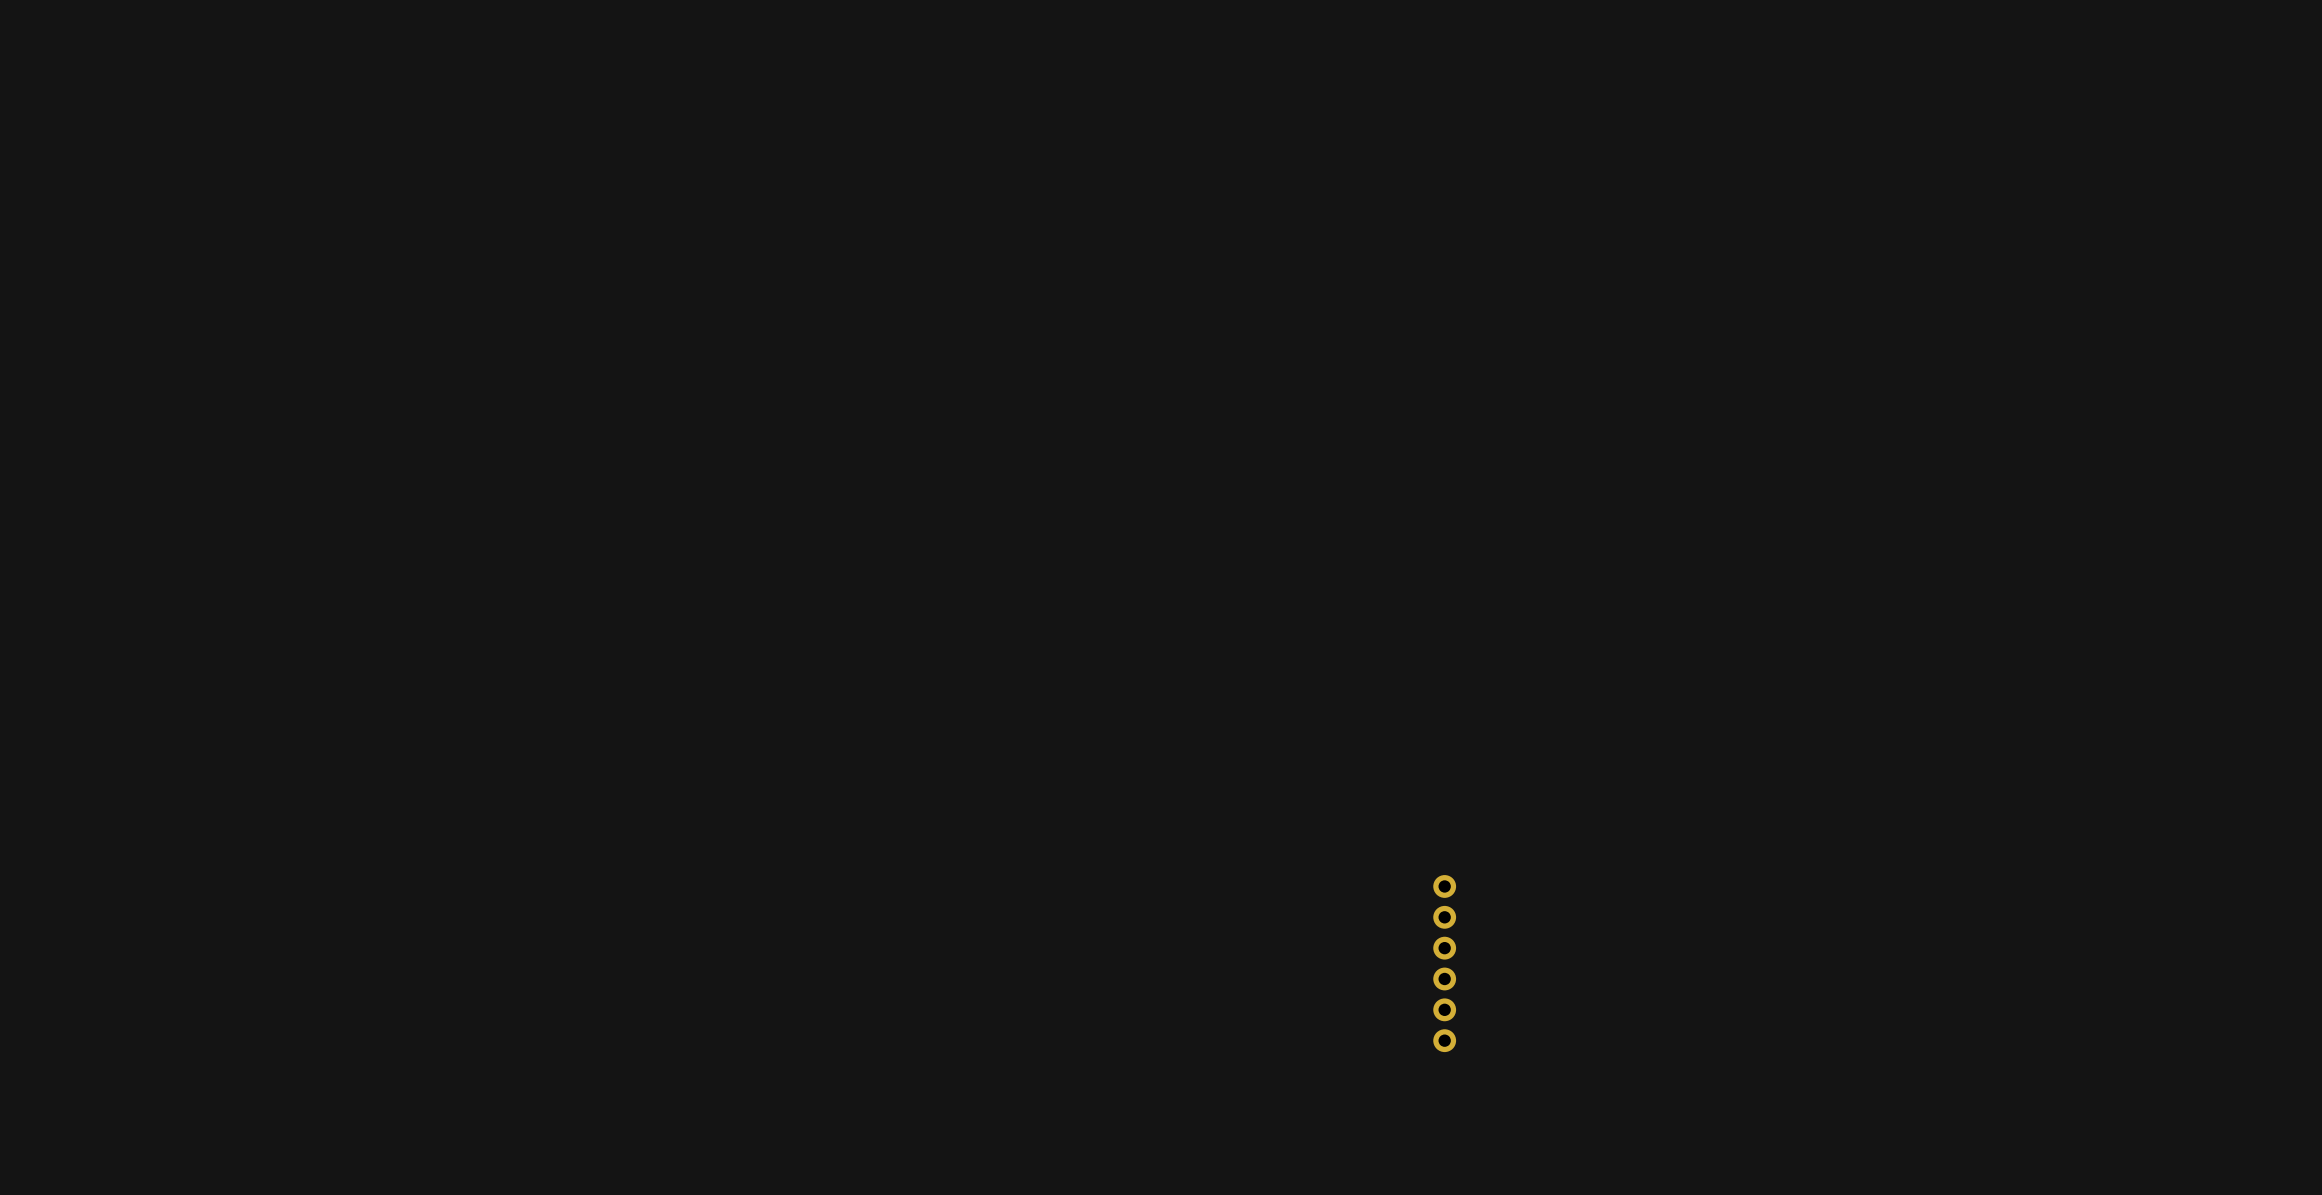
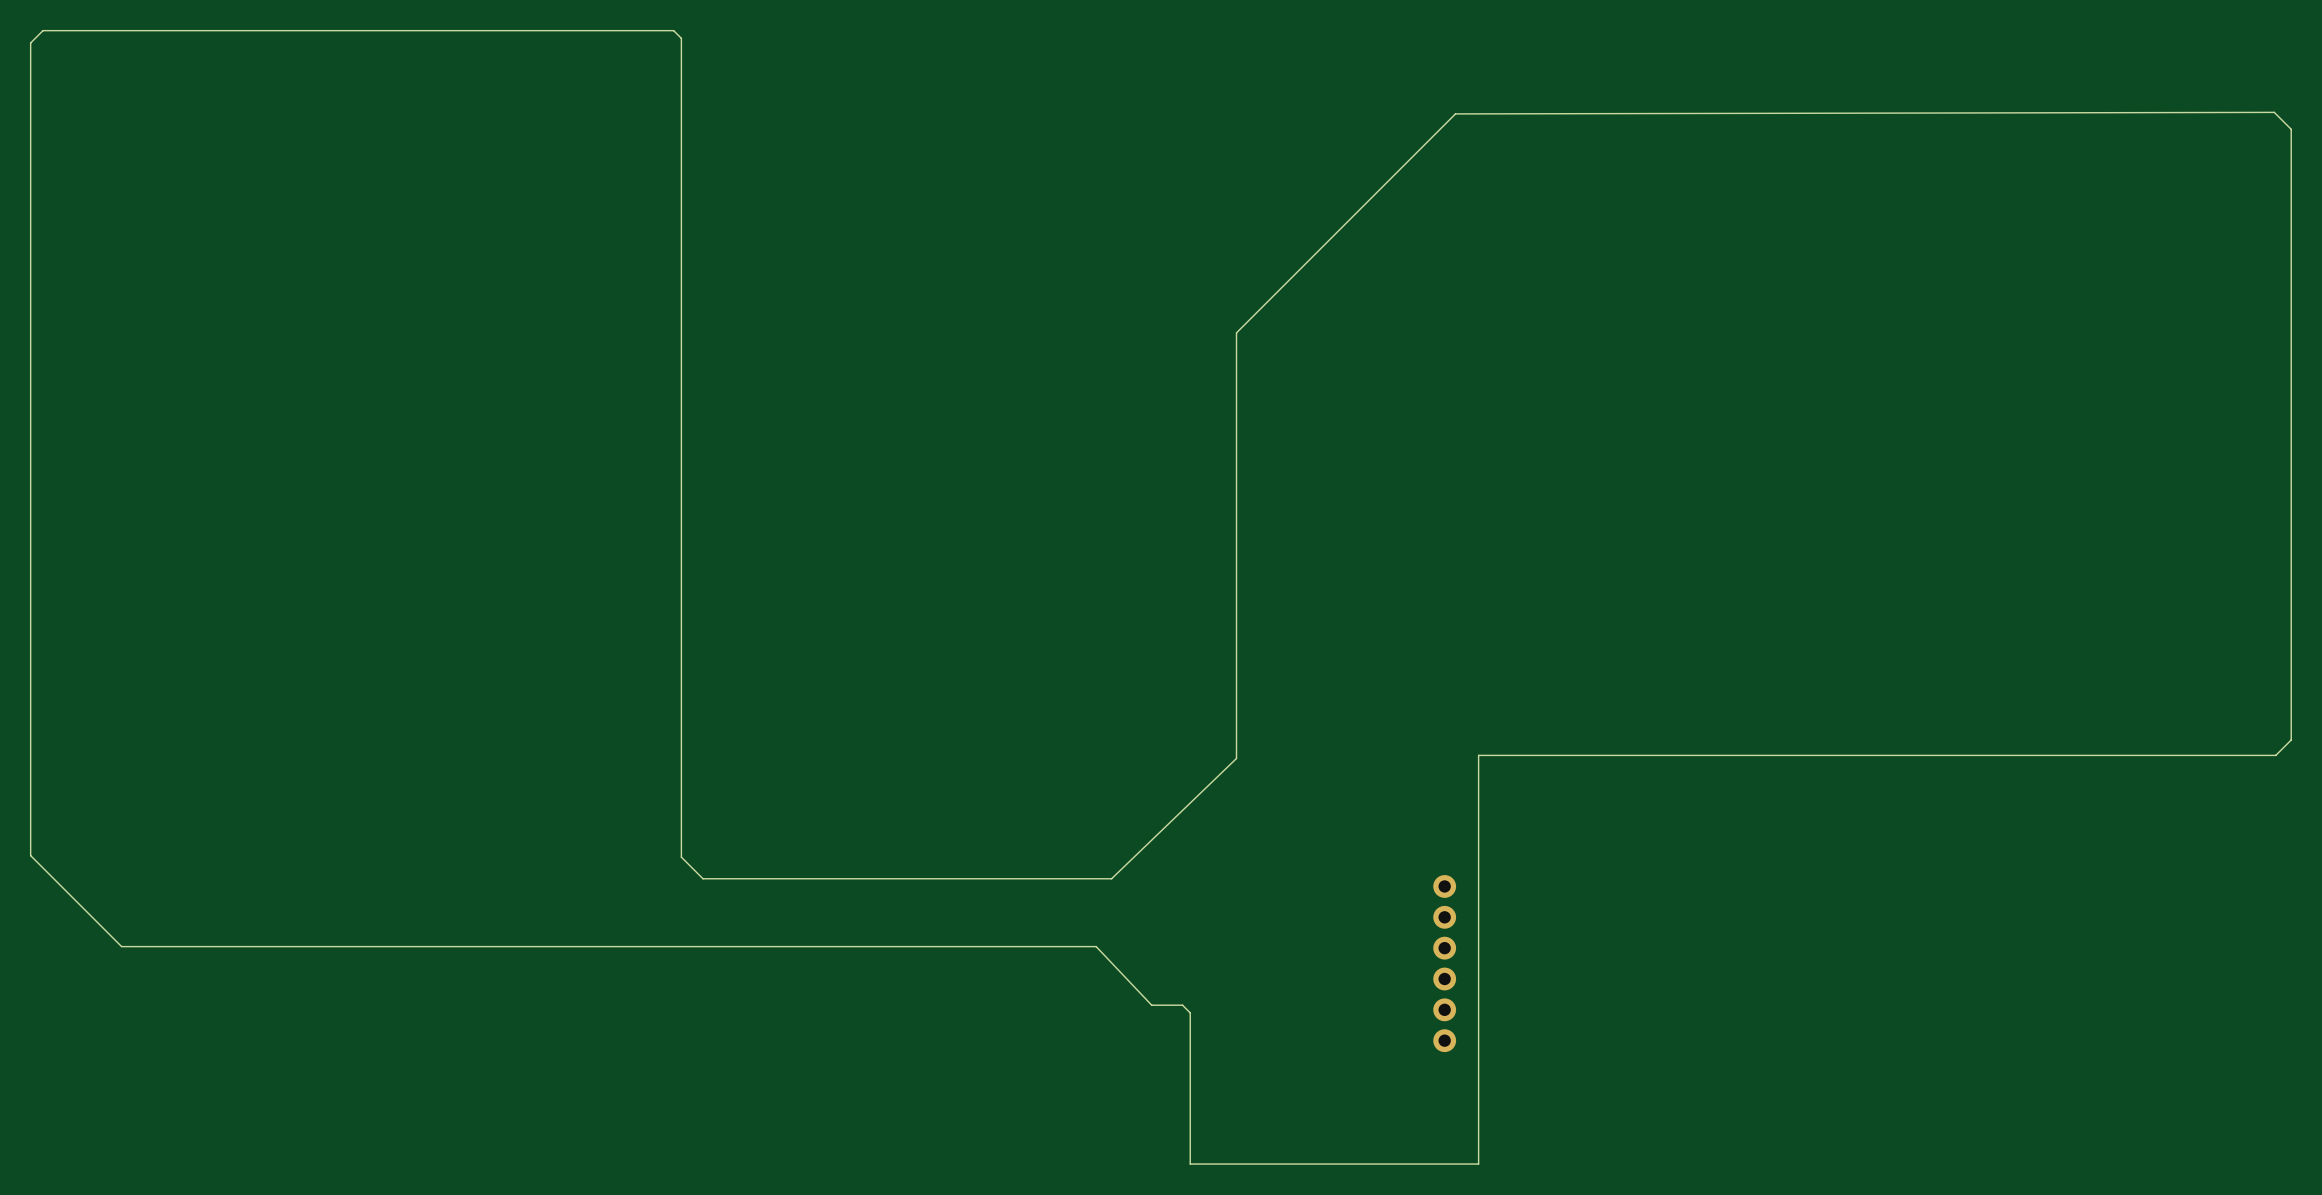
board edge: none -> (673, 30) (681, 38) (681, 857) (702, 878) (1111, 878) (1236, 758) (1236, 332) (1455, 113) (2274, 112) (2291, 129) (2291, 739) (2275, 755) (1478, 755) (1478, 1164) (1190, 1164) (1190, 1012) (1182, 1005) (1151, 1005) (1096, 946) (121, 946) (30, 855) (30, 42) (42, 30) (673, 30)

